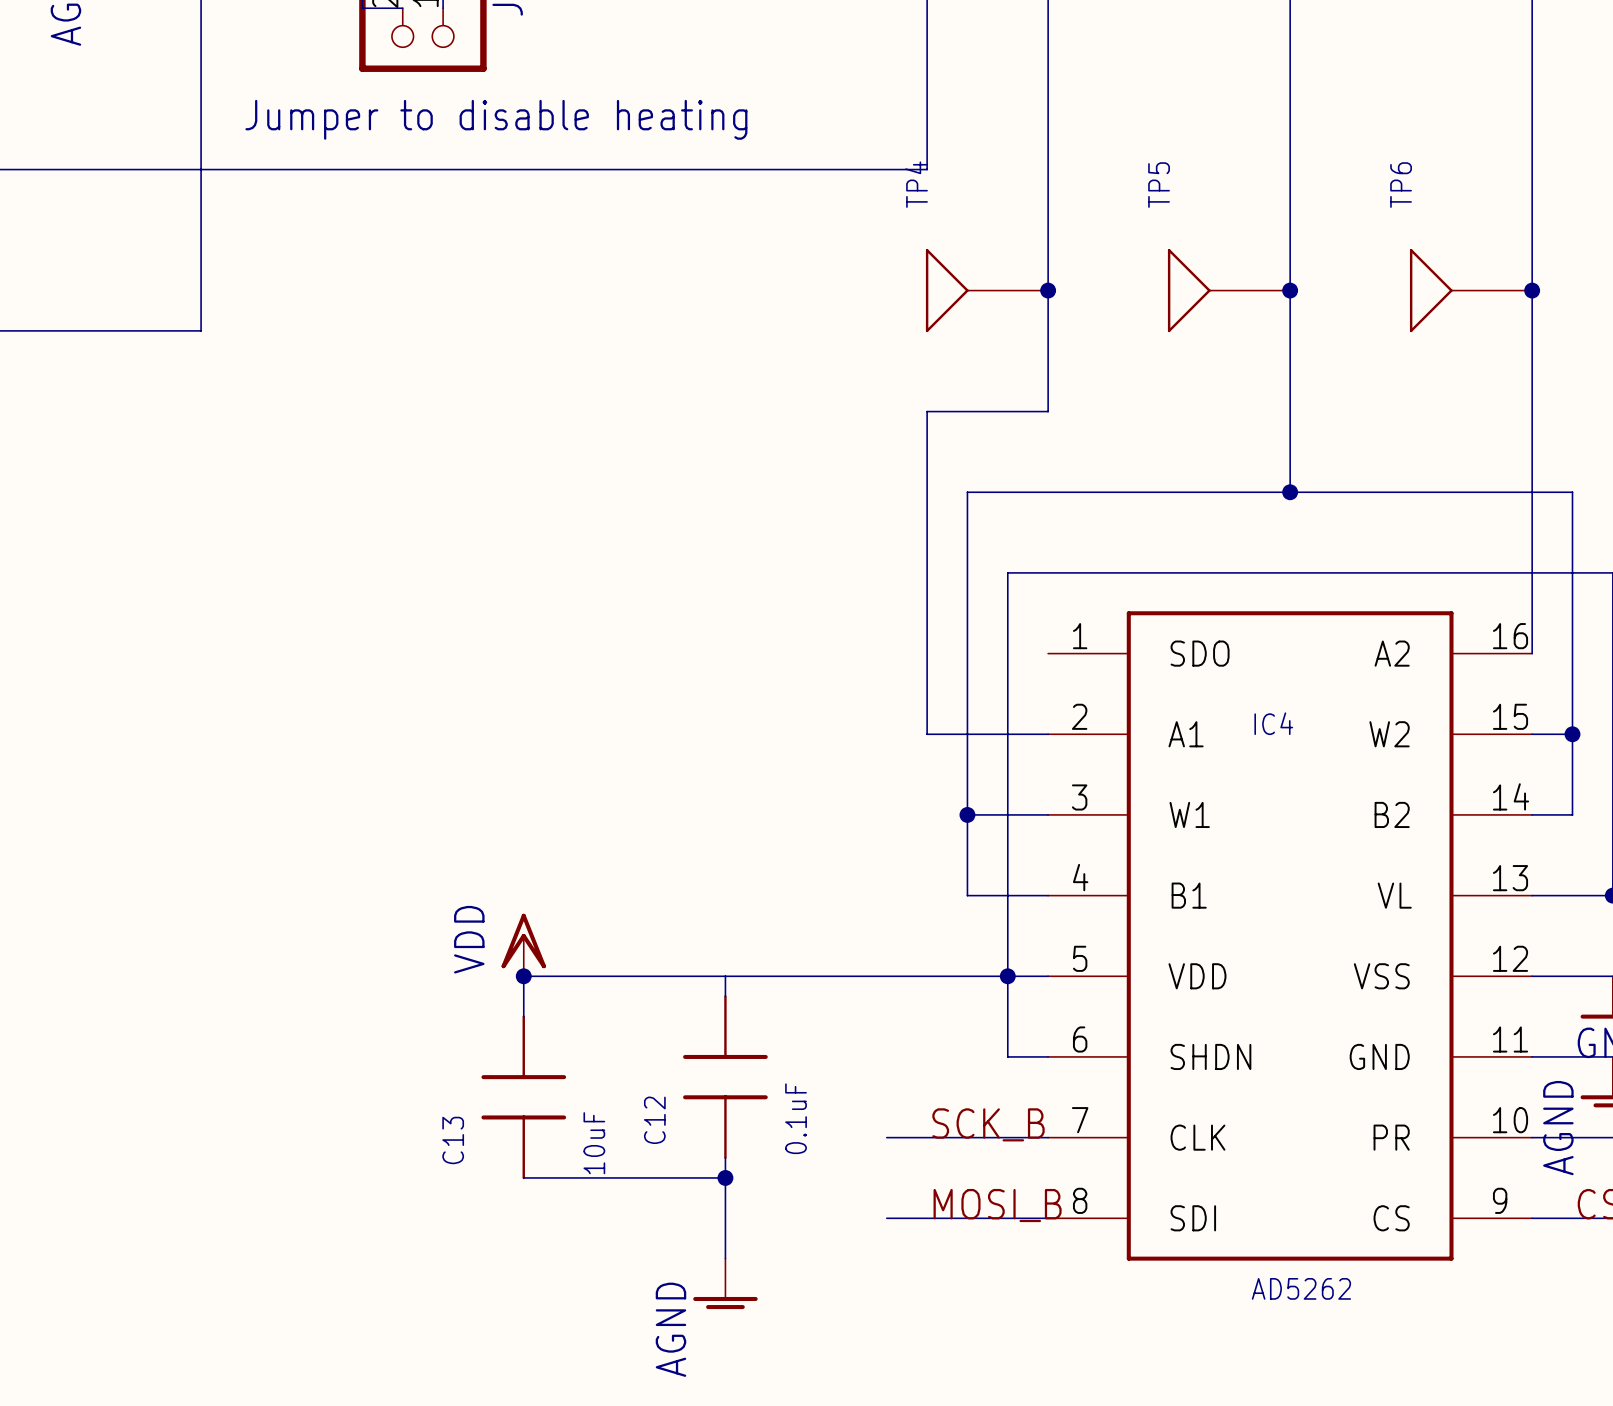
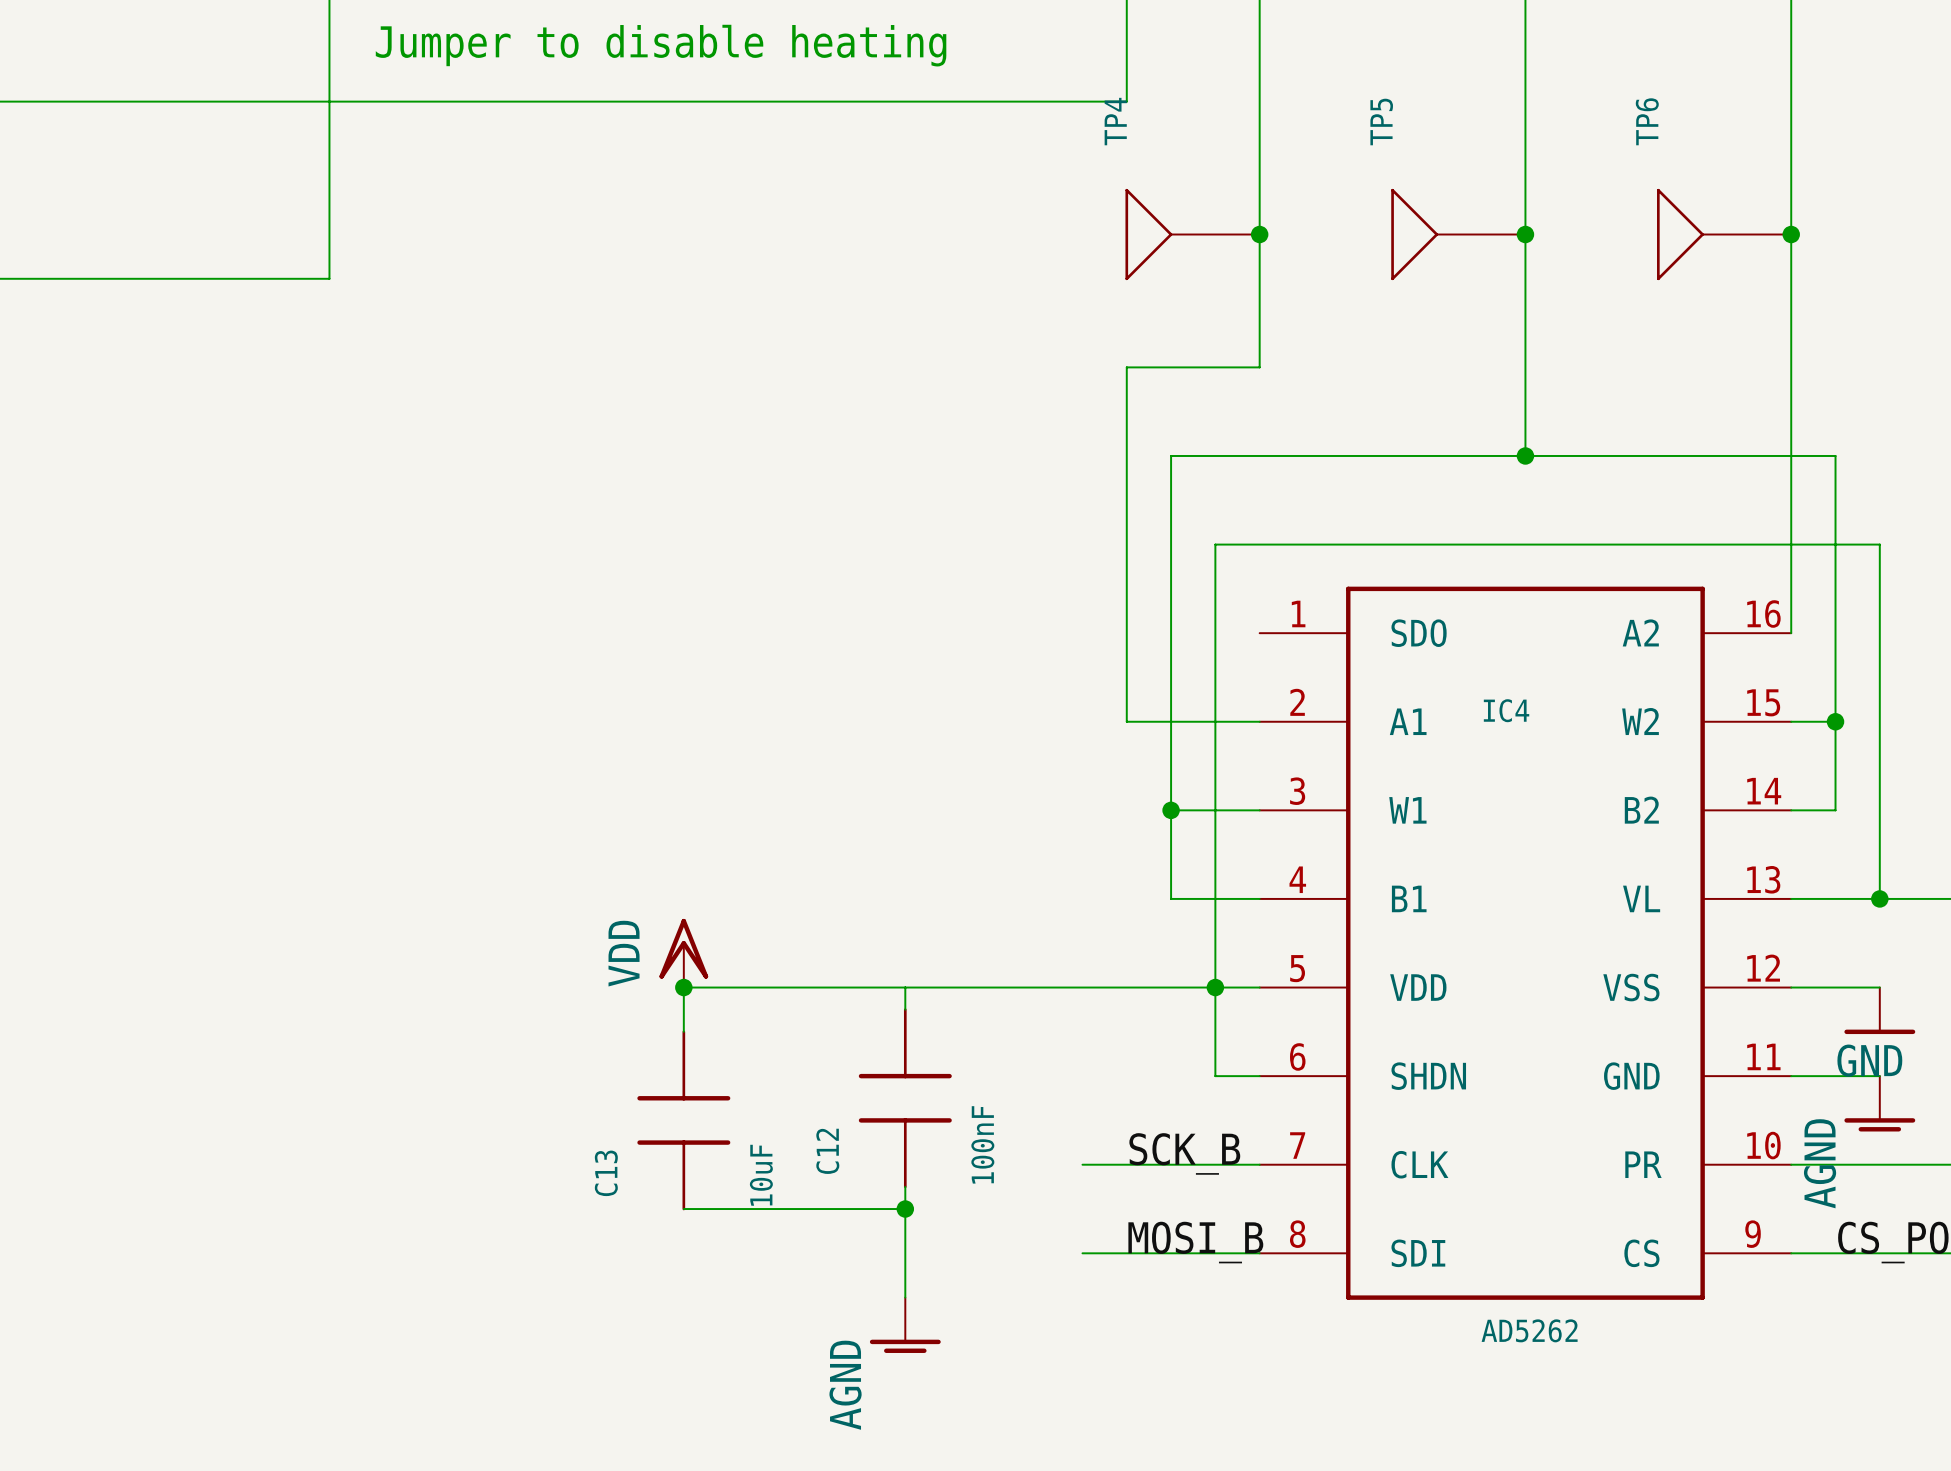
C12 value: 0.1uF (796, 1118) -> 100nF (982, 1144)

